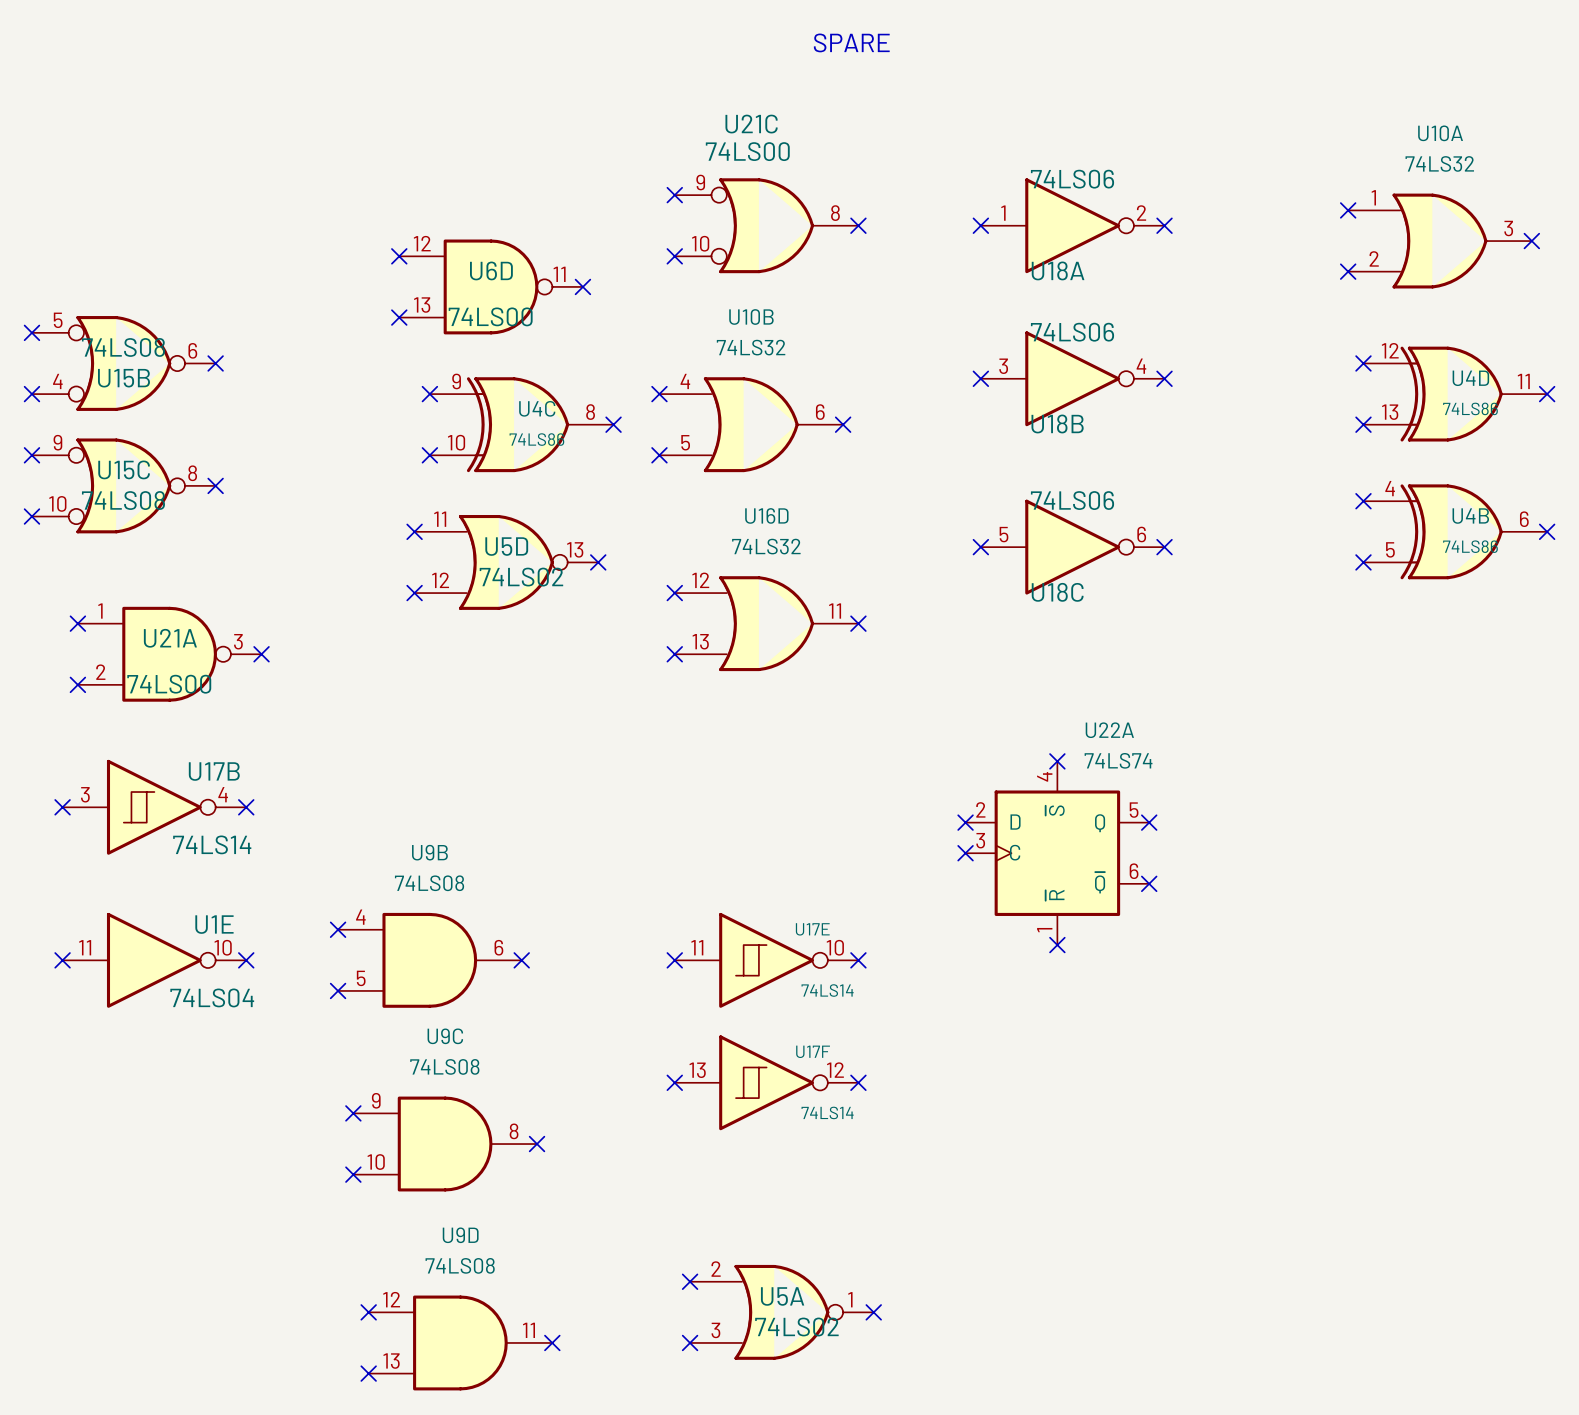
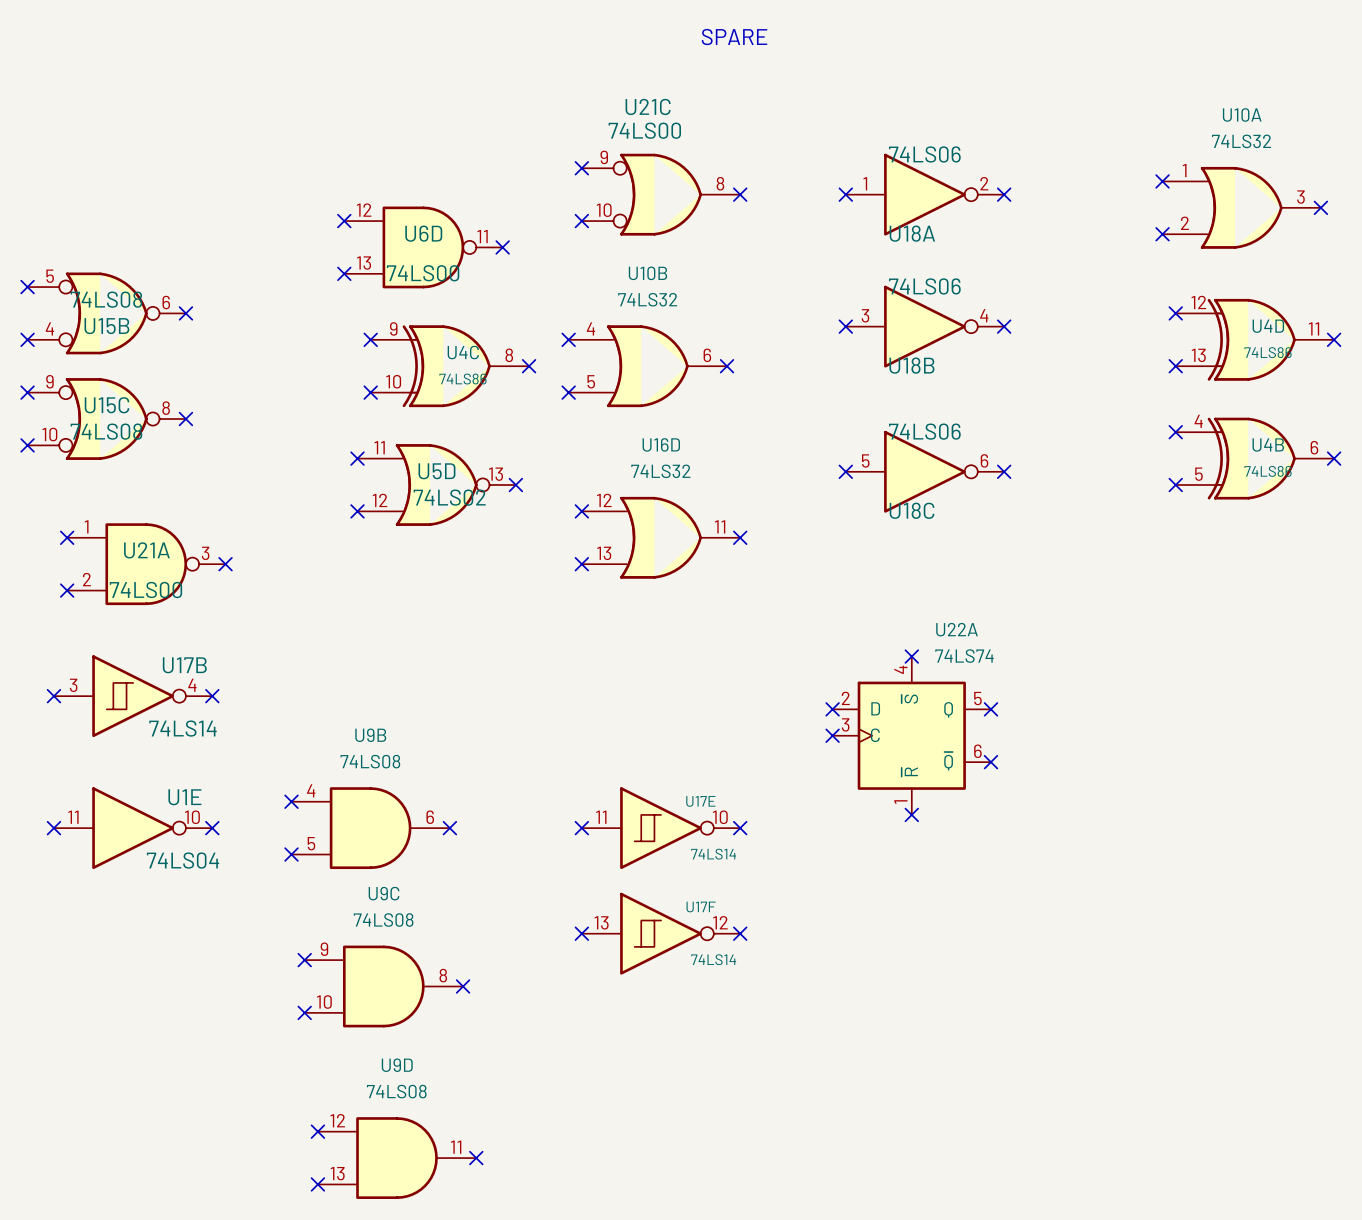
no-connect mark: (690, 1281) -> none
U5A: 74LS02 (781, 1312) -> none
no-connect mark: (873, 1312) -> none
no-connect mark: (690, 1342) -> none

